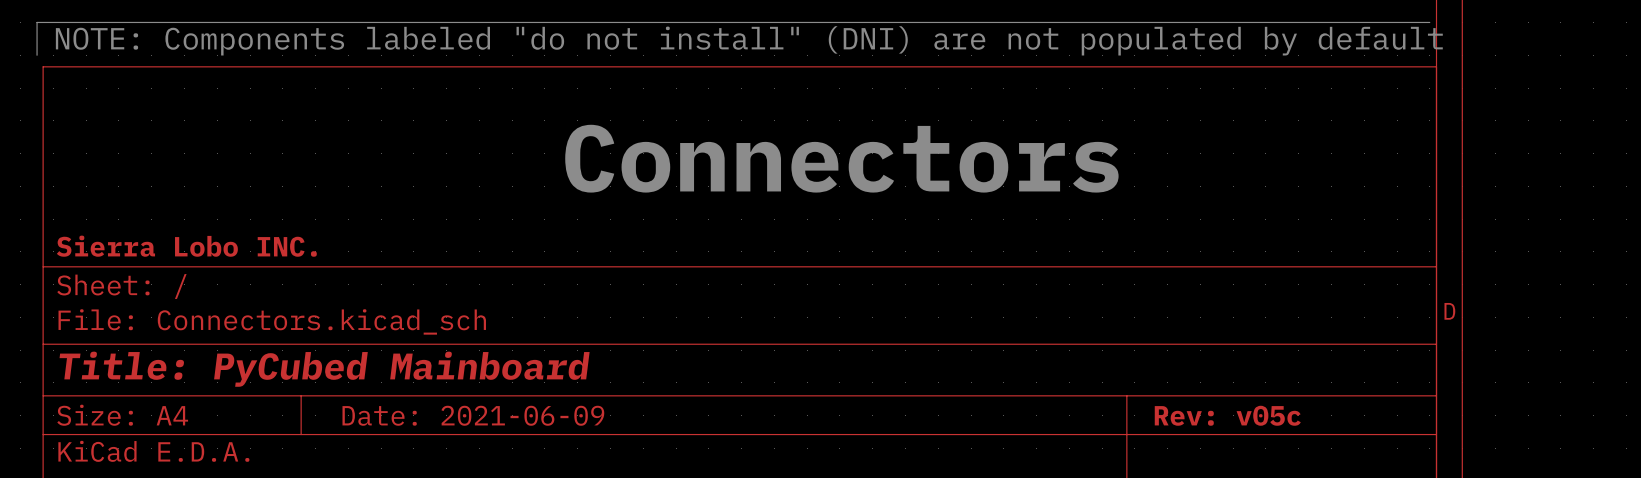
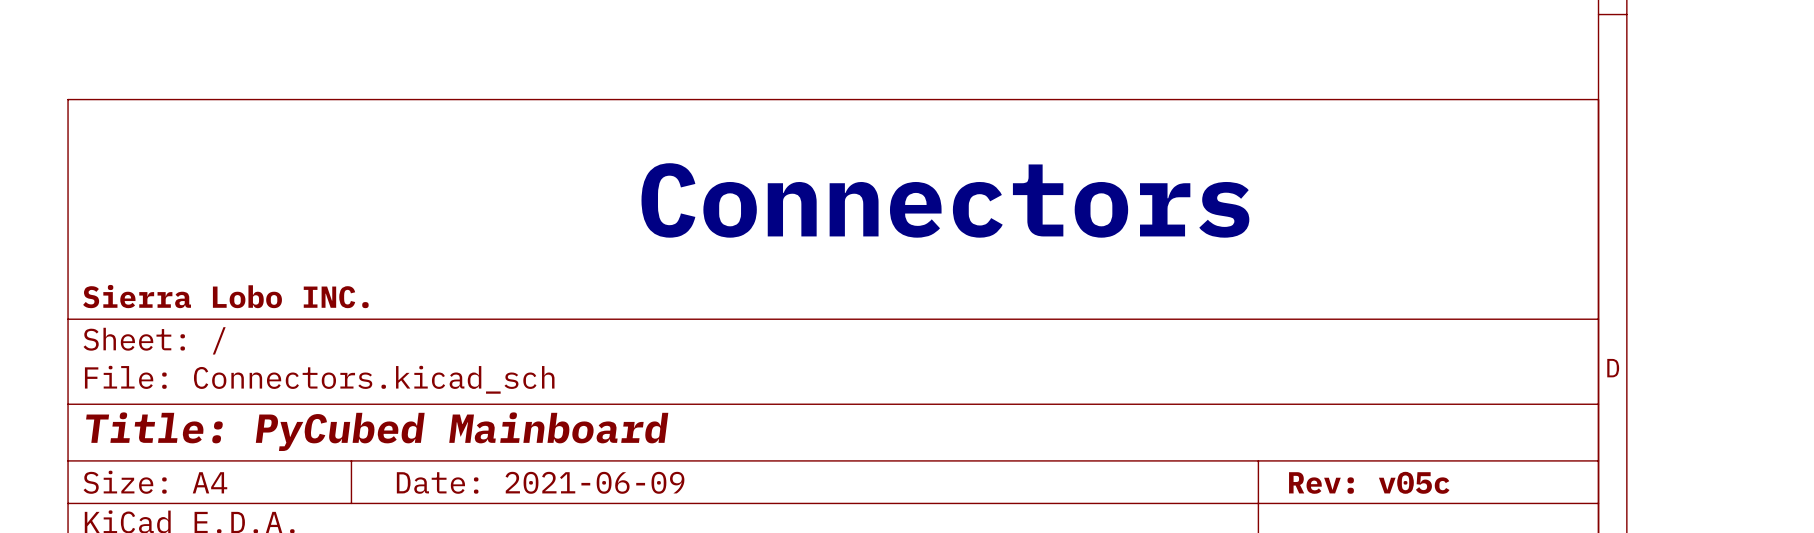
line: (1429, 22) (37, 22) (37, 55) -> none
text: NOTE: Components labeled "do not install" (DNI) are not populated by default (749, 40) -> none

